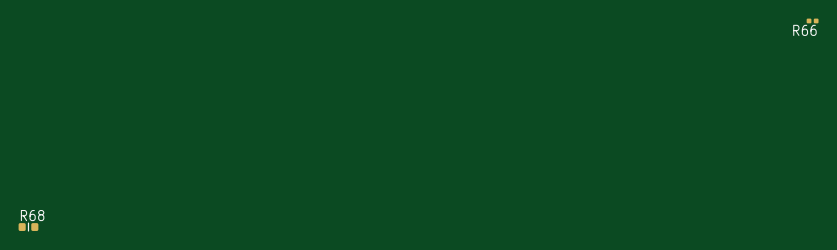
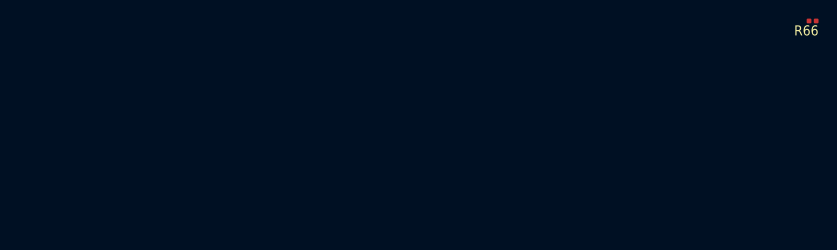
R68: (28, 227) -> none

